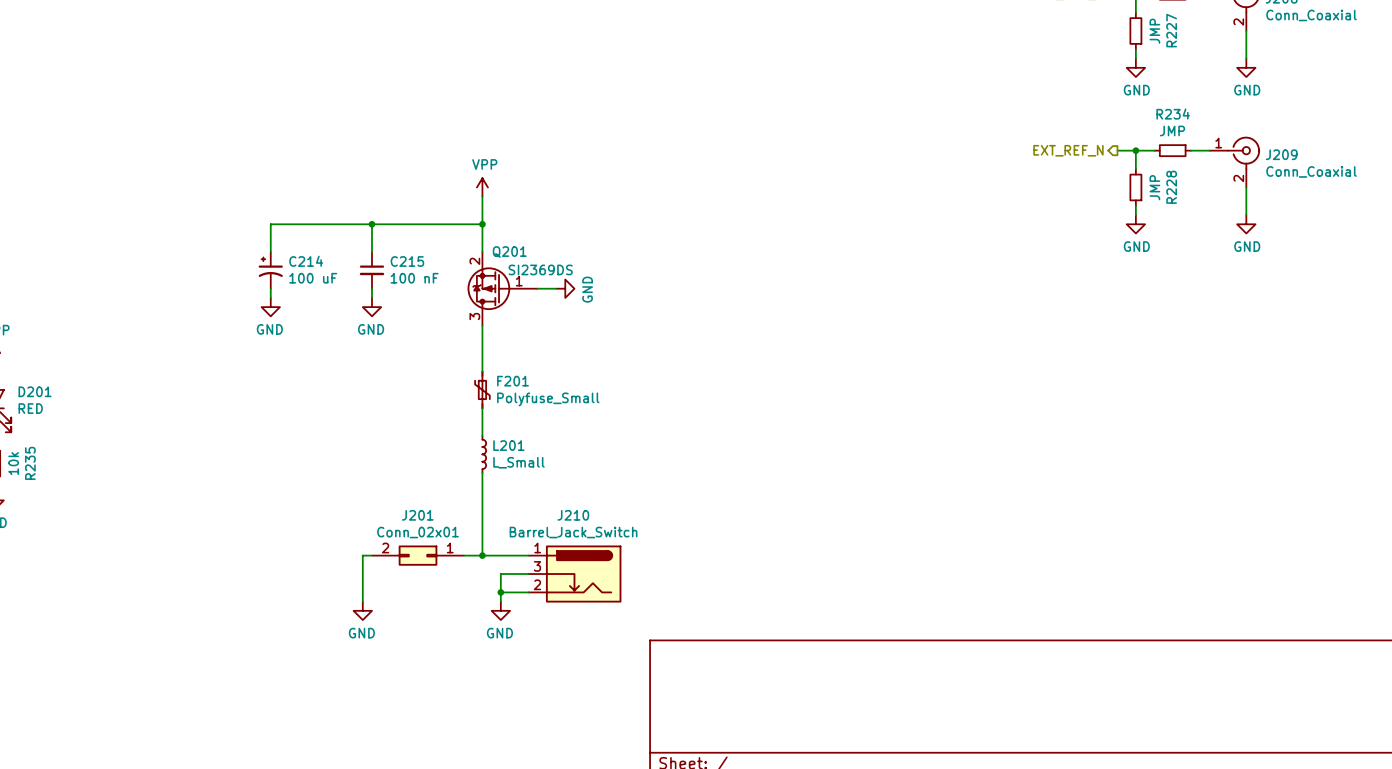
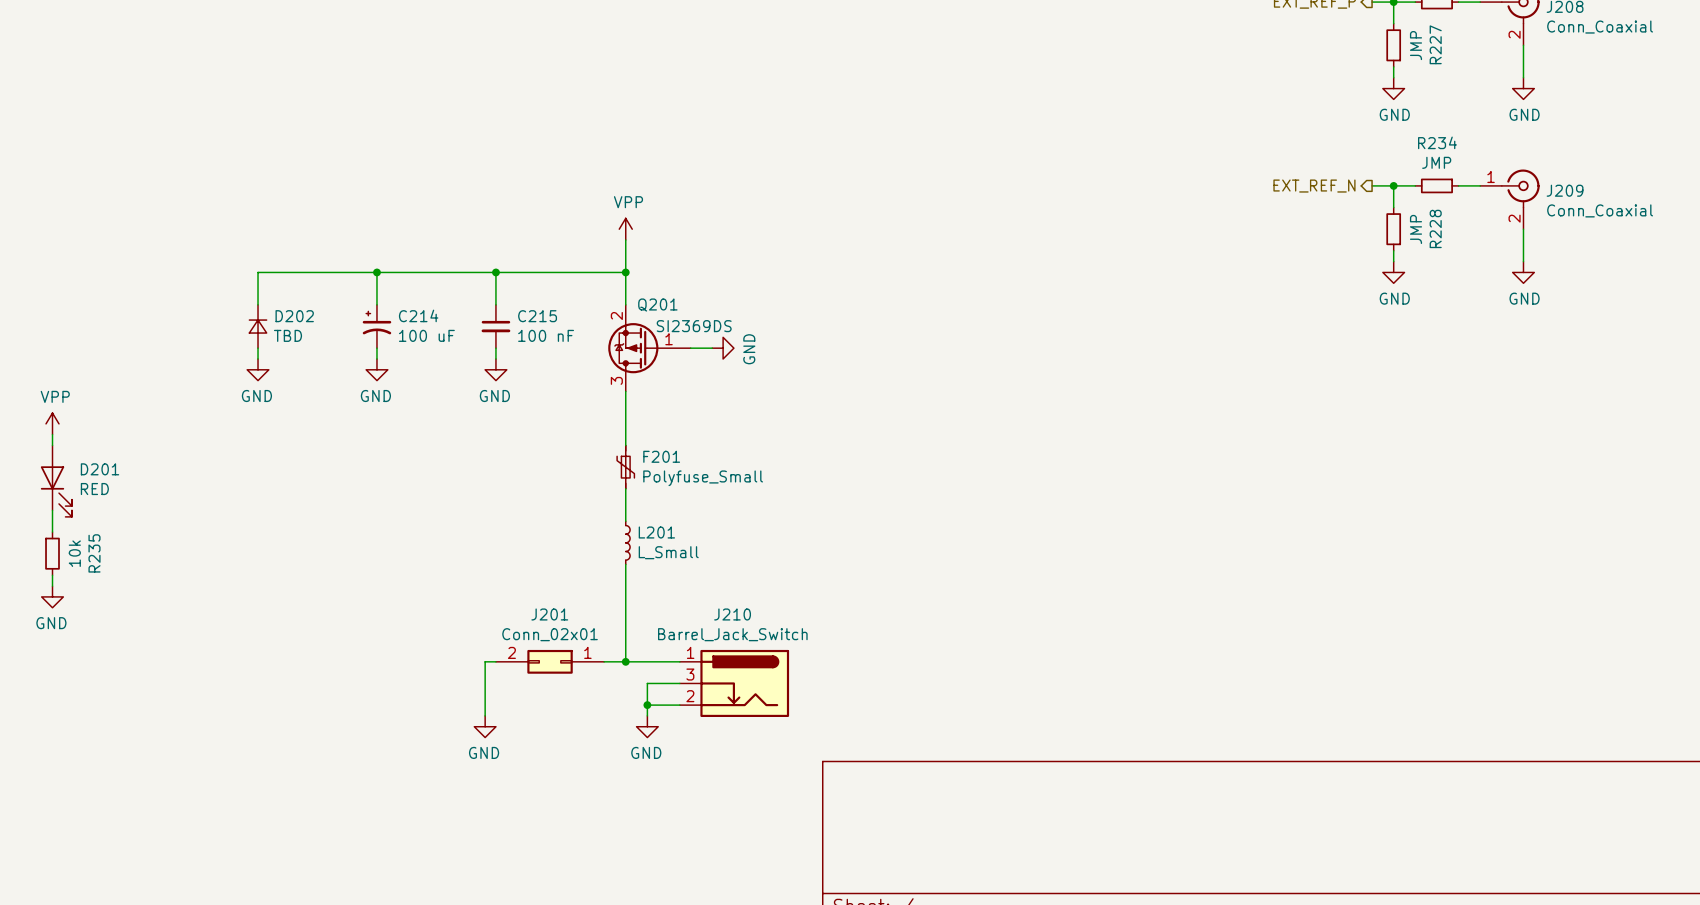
wire: none -> (376, 272) (258, 272) (258, 304)
junction: none -> (376, 272)
D202: none -> TBD (258, 326)
wire: none -> (258, 348) (258, 358)
power symbol: none -> GND (258, 369)

